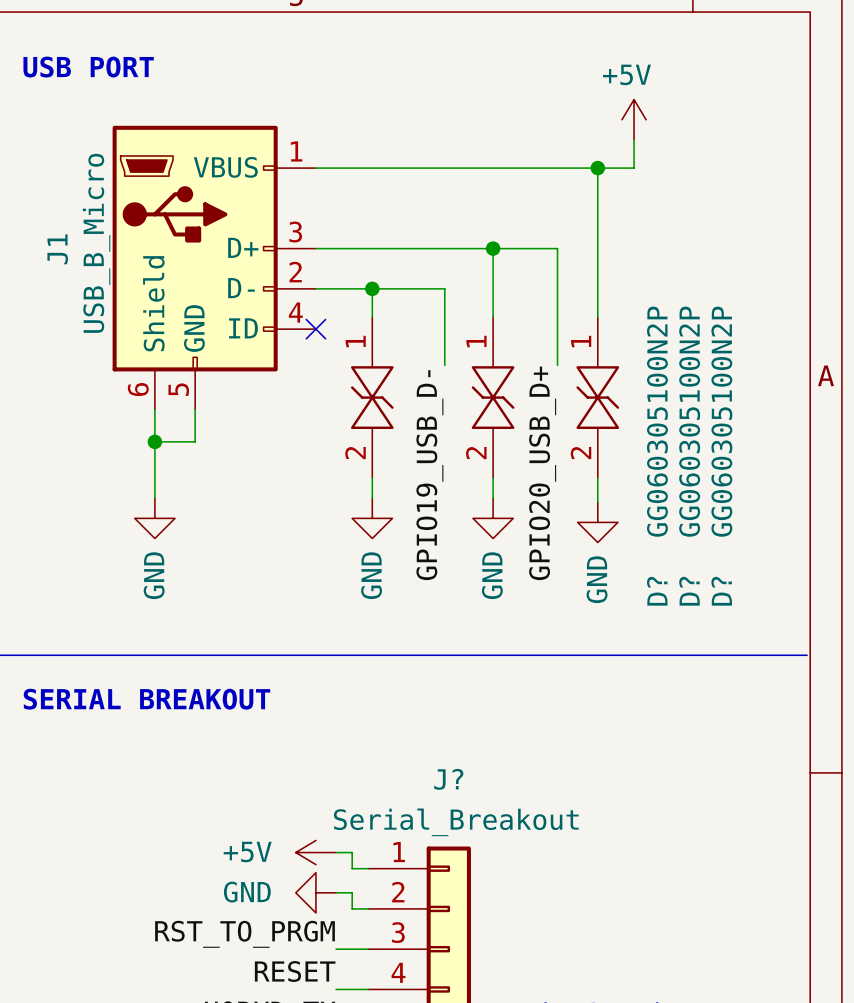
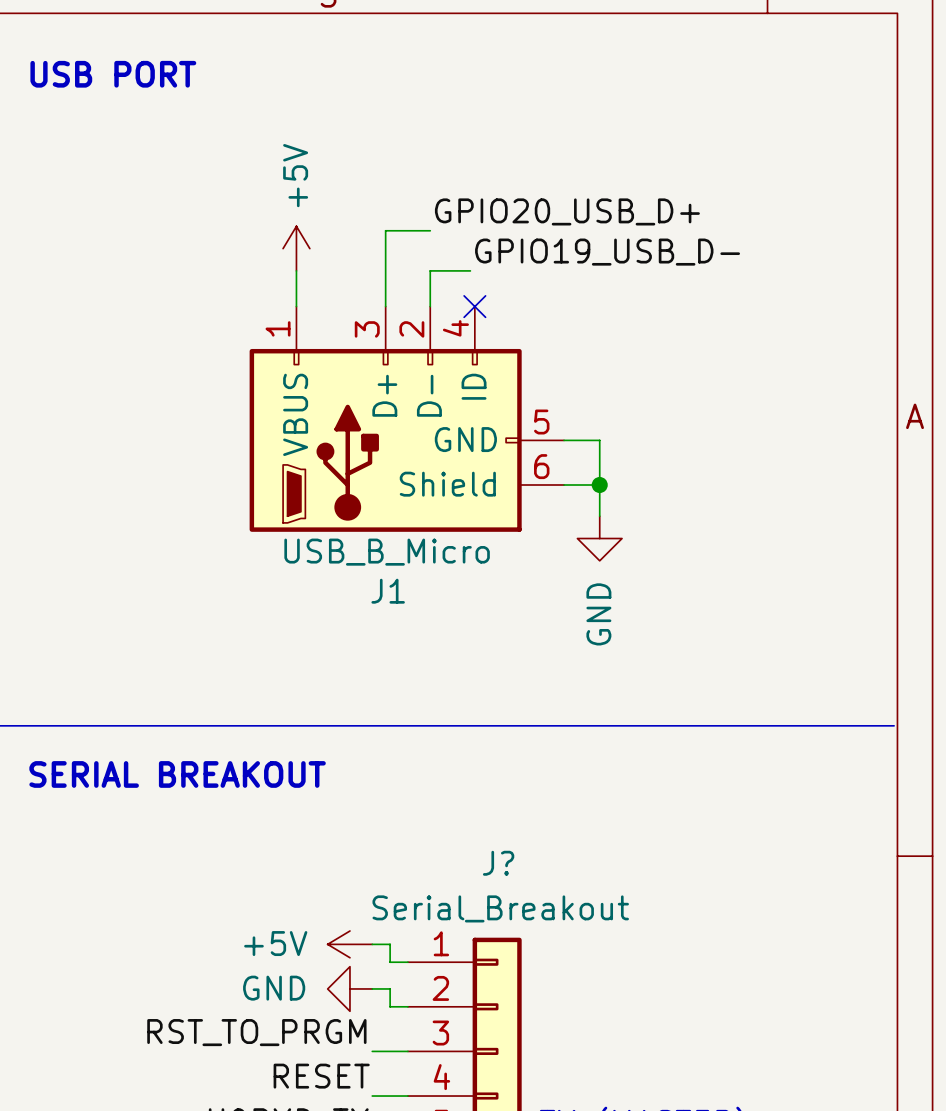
power symbol text rotation: 0° (626, 74) -> 90° counterclockwise (295, 175)
power symbol position: +5V (634, 119) -> +5V (296, 248)
wire: (634, 139) (634, 168) (315, 168) -> none
wire: (597, 168) (597, 317) -> none
junction: (597, 168) -> none
wire: none -> (430, 230) (385, 230) (385, 306)
wire: none -> (470, 270) (430, 270) (430, 306)
J1 rotation: 0° (195, 248) -> 90° counterclockwise (385, 440)
wire: (315, 248) (557, 248) (557, 365) -> none
wire: (493, 248) (493, 317) -> none
junction: (493, 248) -> none
J1 position: (214, 267) -> (406, 419)
no-connect mark: none -> (474, 306)
wire: (315, 288) (444, 288) (444, 365) -> none
wire: (372, 288) (372, 317) -> none
junction: (372, 288) -> none
no-connect mark: (315, 329) -> none
D?: GG060305100N2P (372, 397) -> none
D?: GG060305100N2P (493, 397) -> none
wire: none -> (564, 440) (599, 440) (599, 516)
D?: GG060305100N2P (597, 397) -> none
wire: (154, 409) (154, 498) -> none
wire: (195, 409) (195, 441) (154, 441) -> none
wire: none -> (564, 485) (599, 485)
junction: none -> (599, 485)
junction: (154, 441) -> none
label rotation: 0° (542, 473) -> 90° clockwise (567, 211)
label position: GPIO20_USB_D+ (542, 473) -> GPIO20_USB_D+ (567, 211)
label rotation: 0° (429, 475) -> 90° clockwise (607, 252)
label position: GPIO19_USB_D- (429, 475) -> GPIO19_USB_D- (607, 252)
wire: (372, 478) (372, 498) -> none
wire: (493, 478) (493, 498) -> none
wire: (597, 478) (597, 502) -> none
power symbol: none -> GND (599, 538)
power symbol: GND (154, 518) -> none
power symbol: GND (372, 518) -> none
power symbol: GND (493, 518) -> none
power symbol: GND (597, 522) -> none

